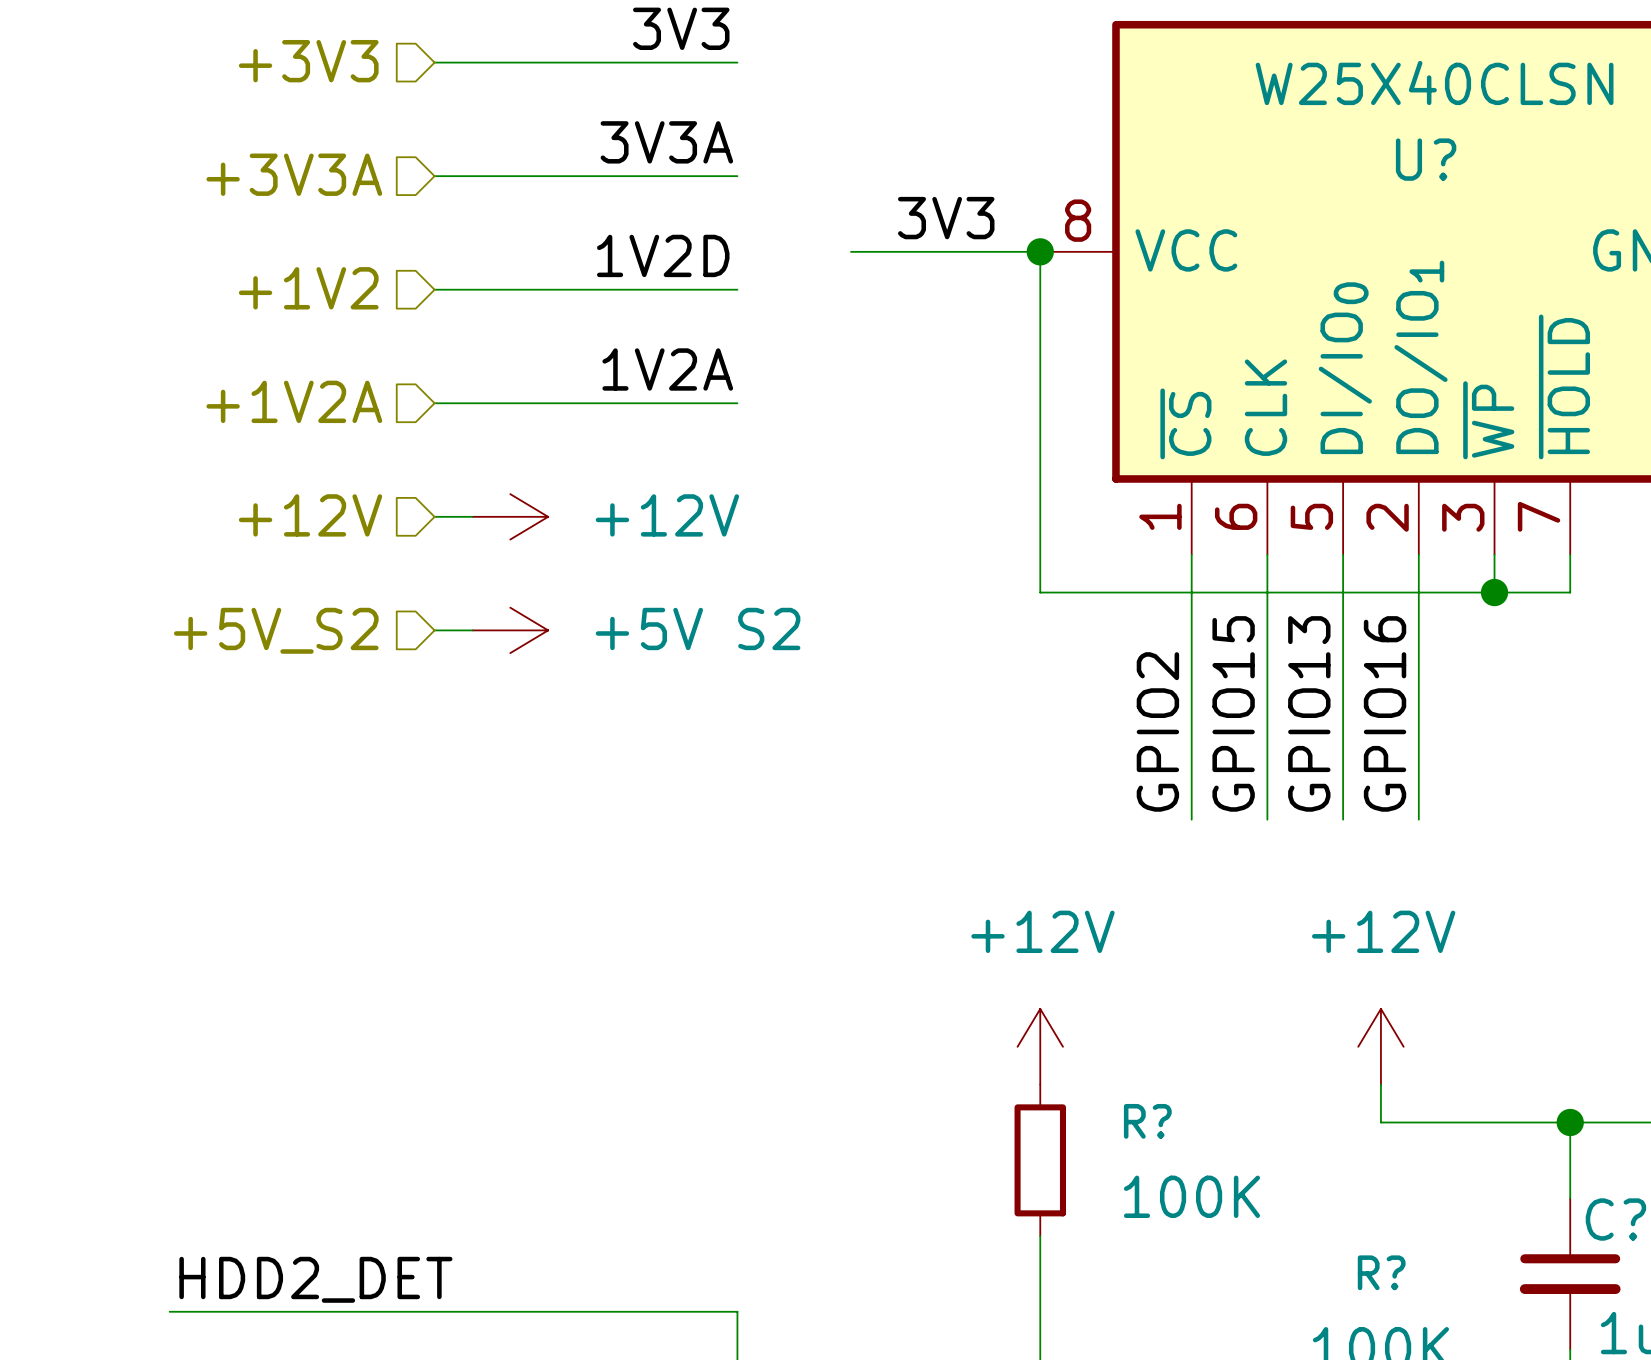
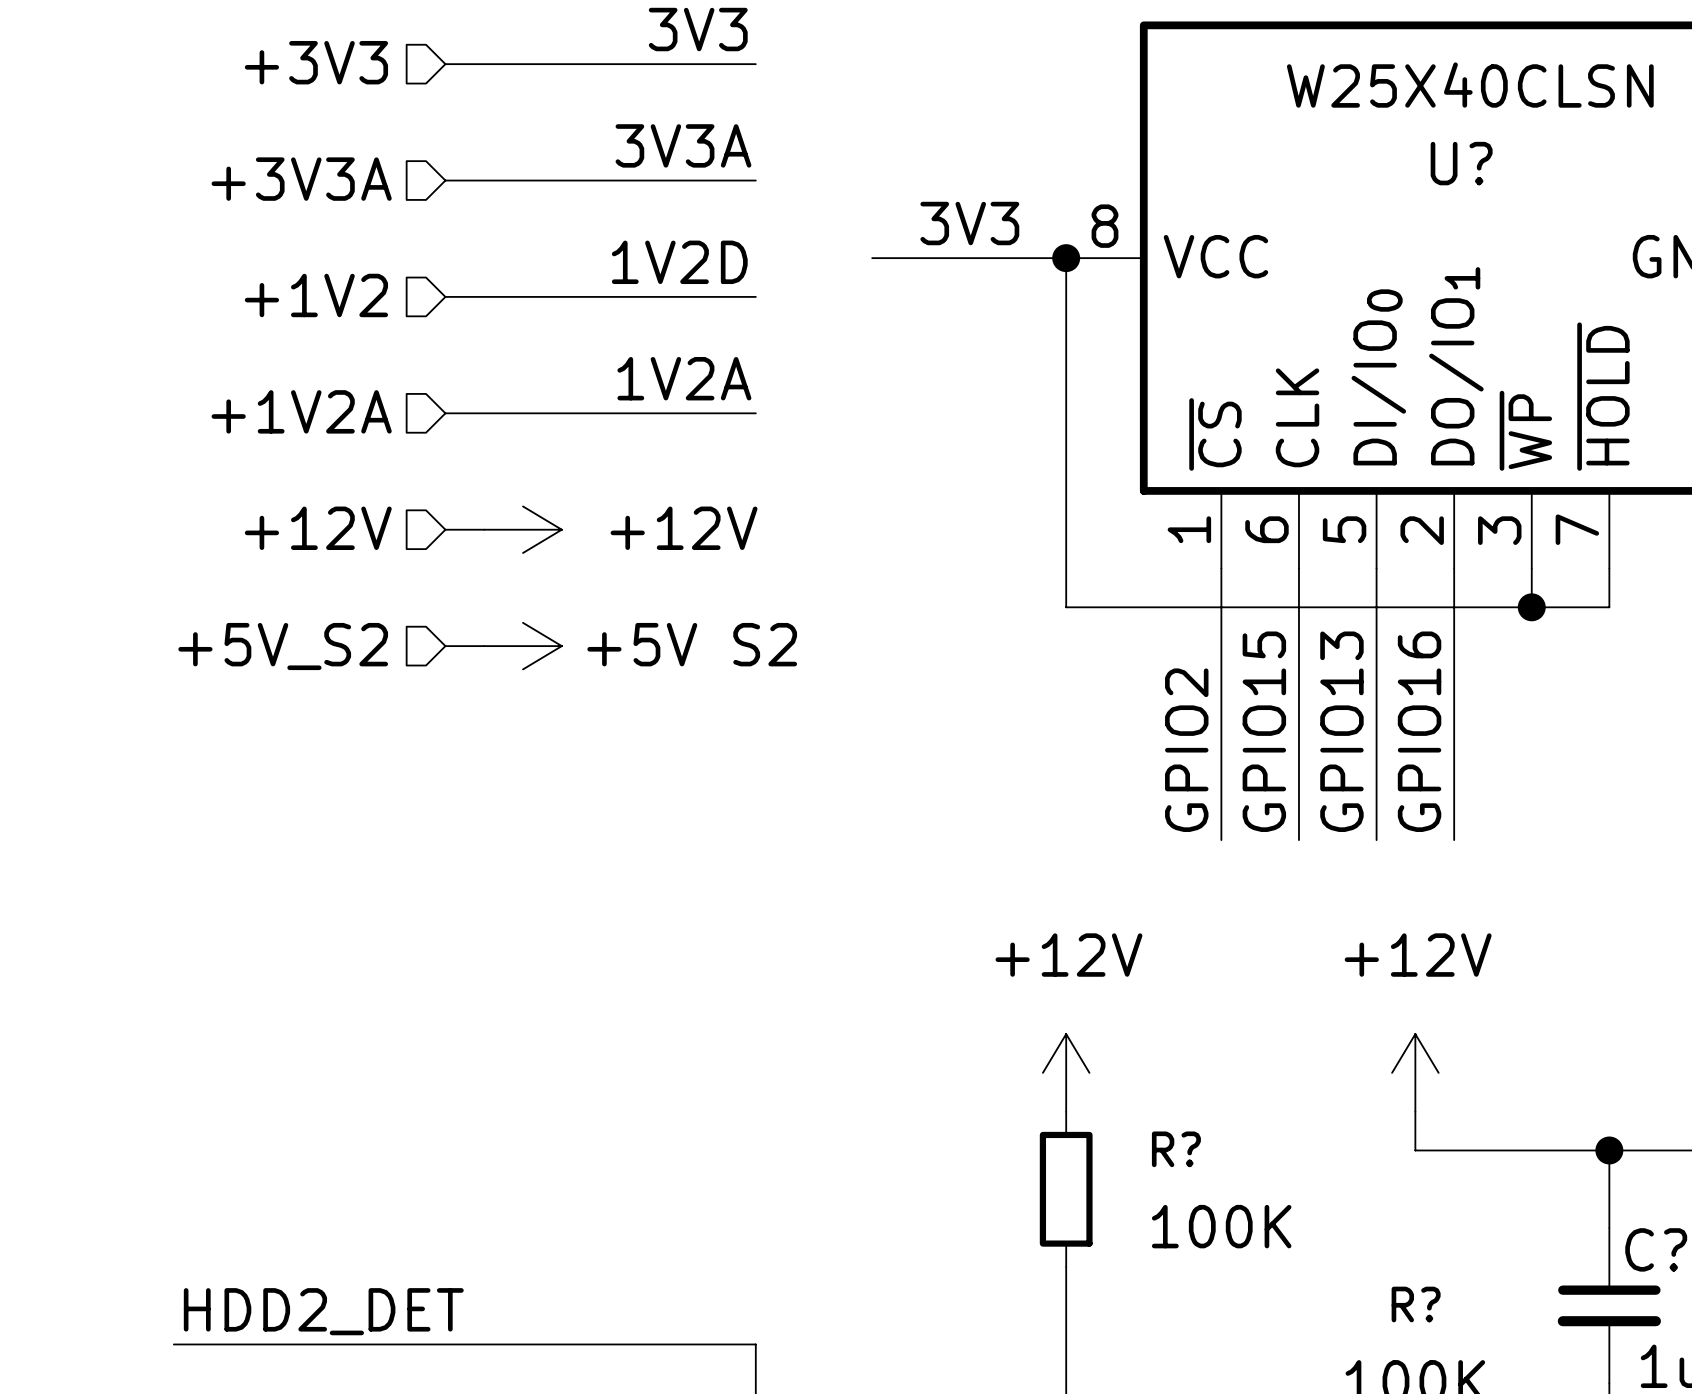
power symbol text position: +5V S2 (698, 628) -> +5V S2 (692, 644)

